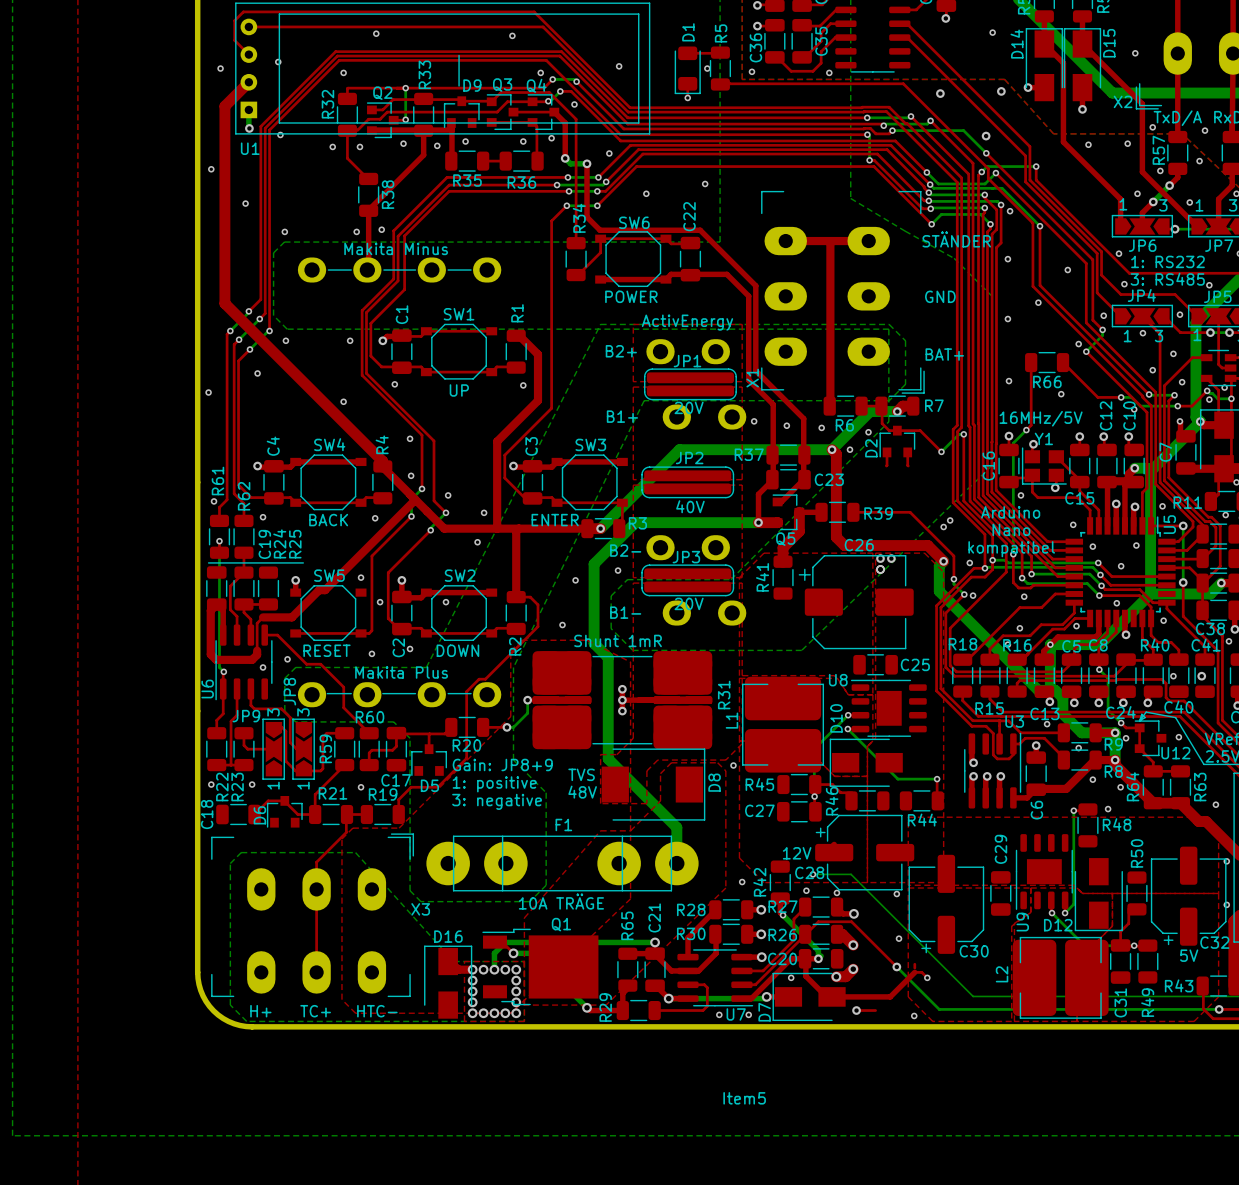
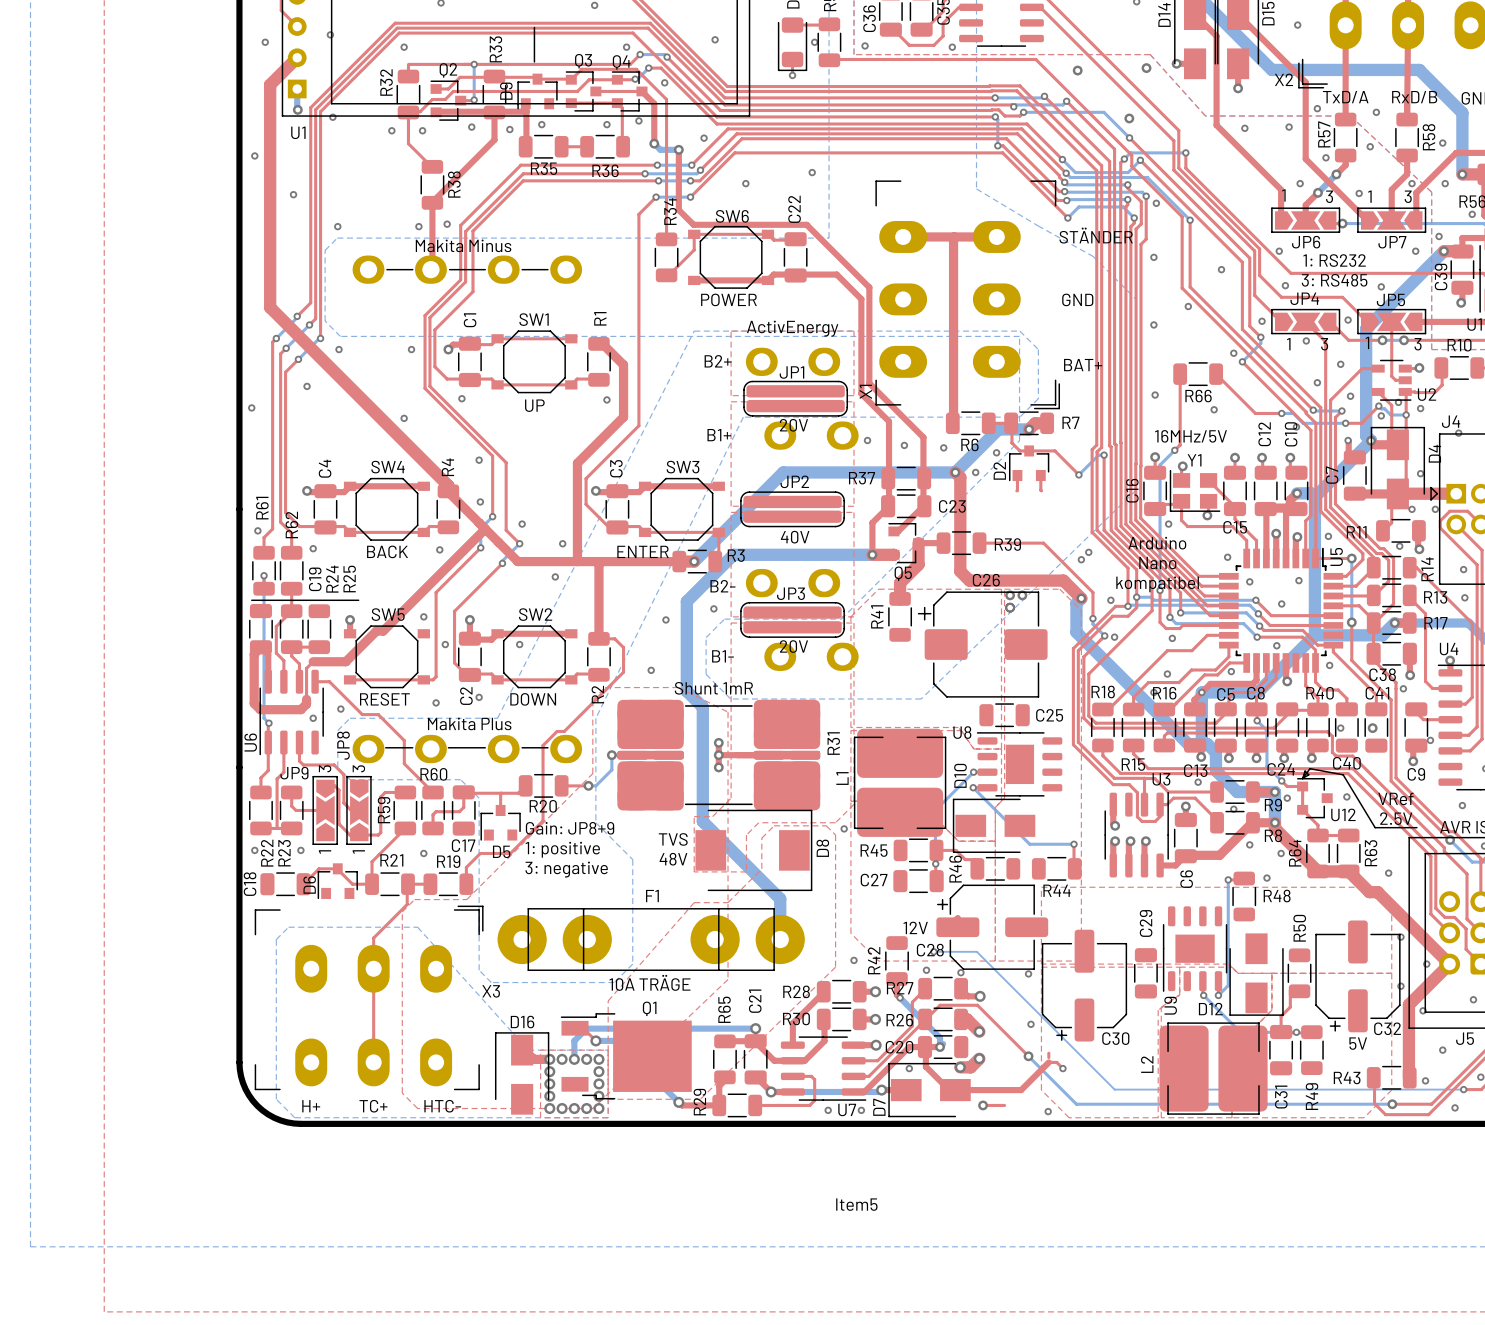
D9 name rotation: 0° (472, 85) -> 90° counterclockwise (506, 91)
D9 name position: D9 (472, 85) -> D9 (506, 91)

